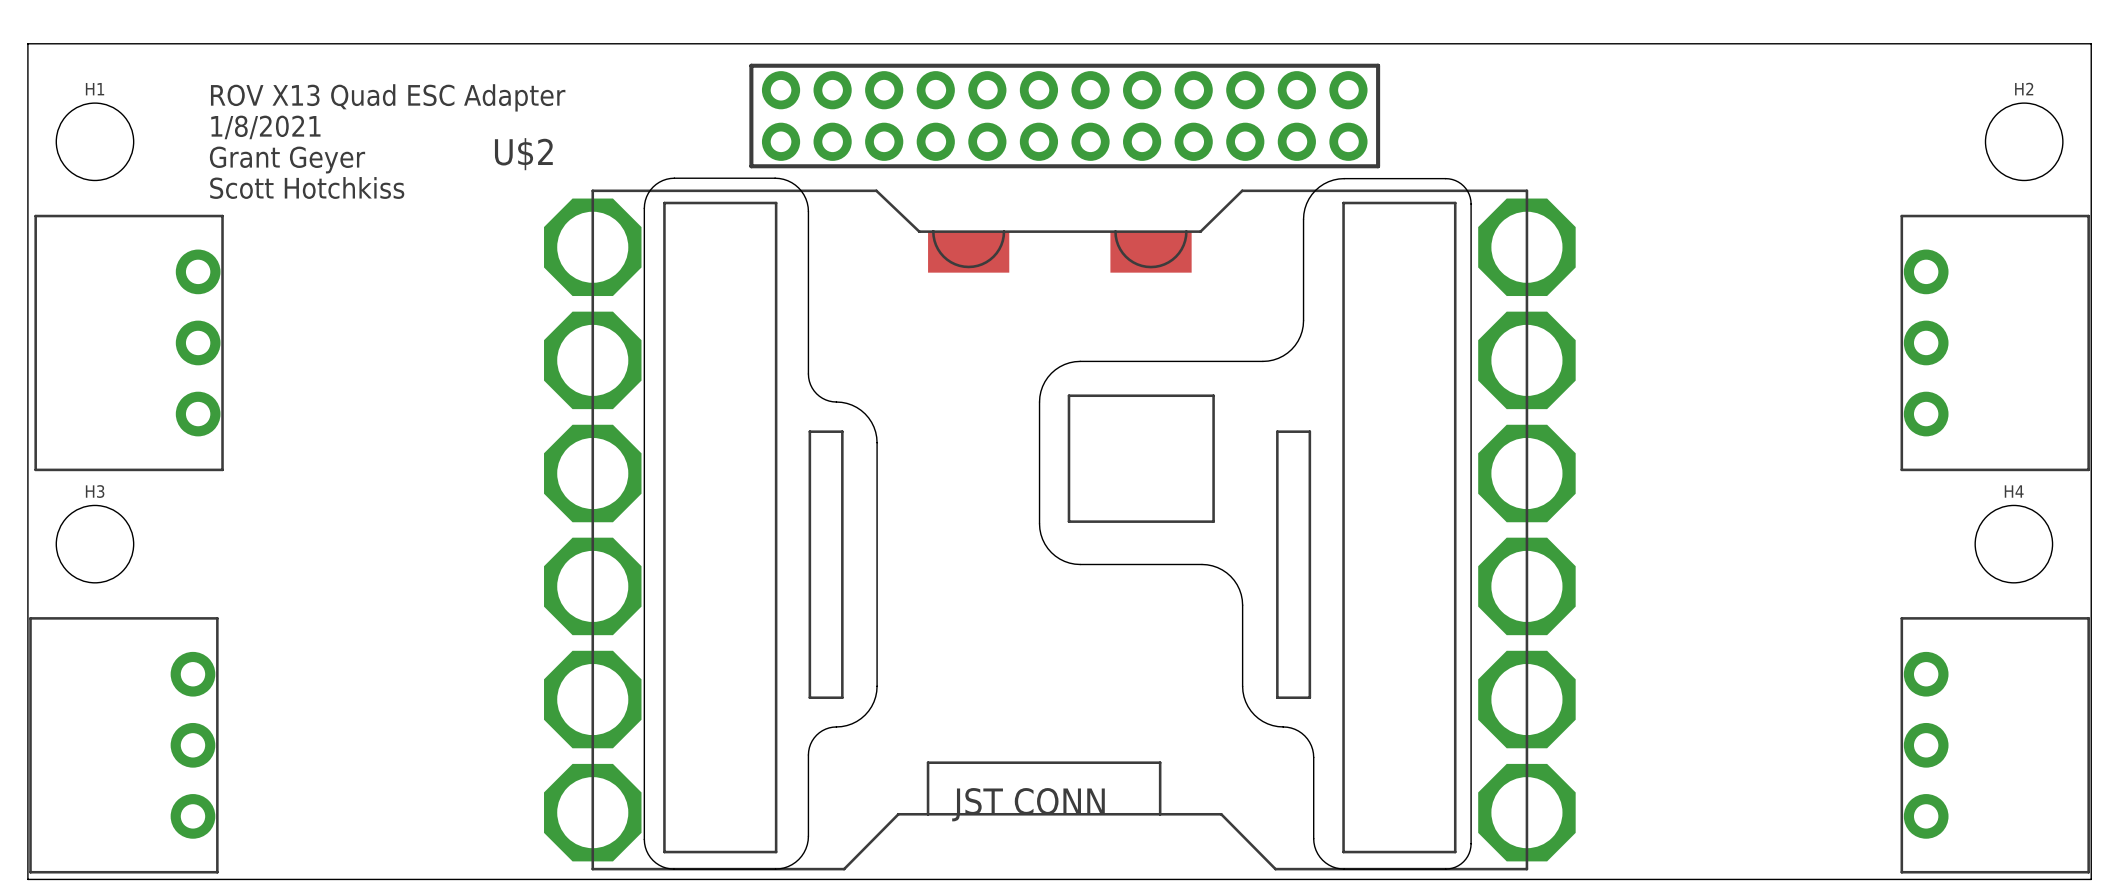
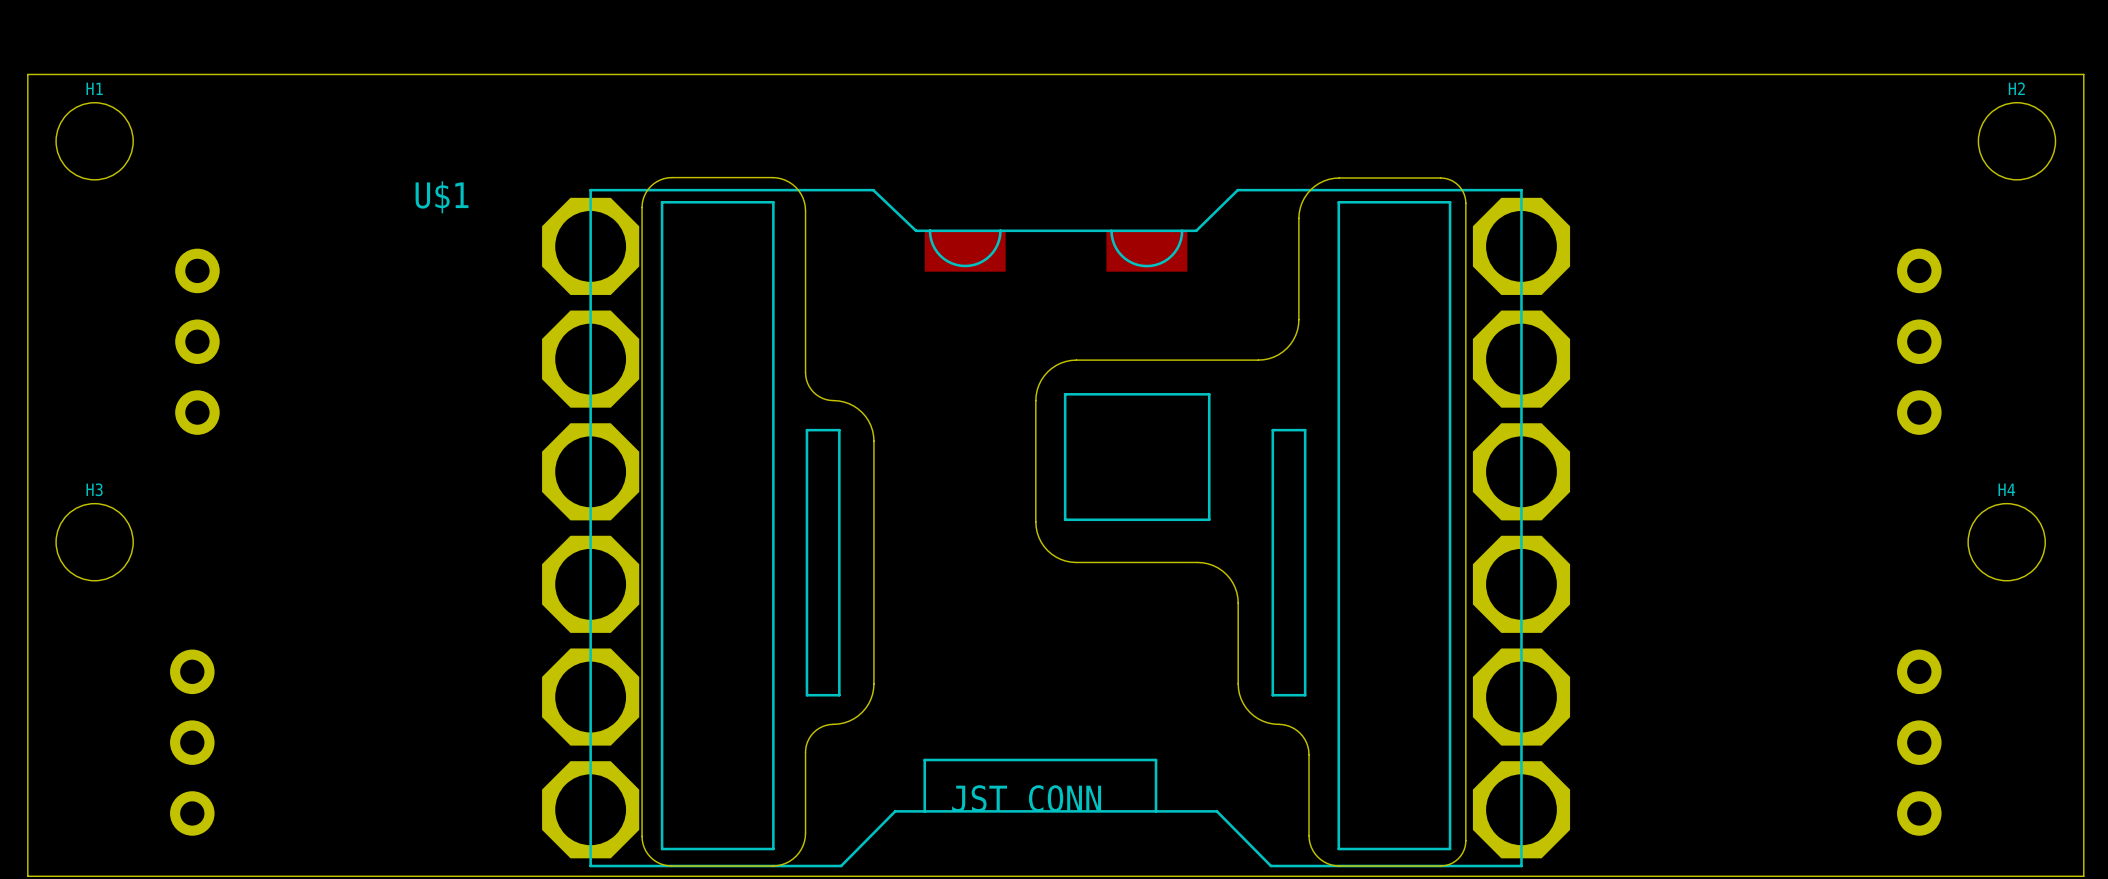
board edge: (27, 74) (27, 43) (2091, 43) (2091, 74) -> (27, 74) (2083, 74)
text: ROV X13 Quad ESC Adapter (388, 97) -> none
U$2: (1064, 116) -> none
text: 1/8/2021 (265, 127) -> none
text: Grant Geyer (287, 160) -> none
text: Scott Hotchkiss (307, 187) -> none
U$1: none -> (442, 197)
part side: top (129, 342) -> bottom (197, 341)
part side: top (1995, 342) -> bottom (1919, 341)
part side: top (123, 745) -> bottom (192, 742)
part side: top (1995, 745) -> bottom (1919, 742)

